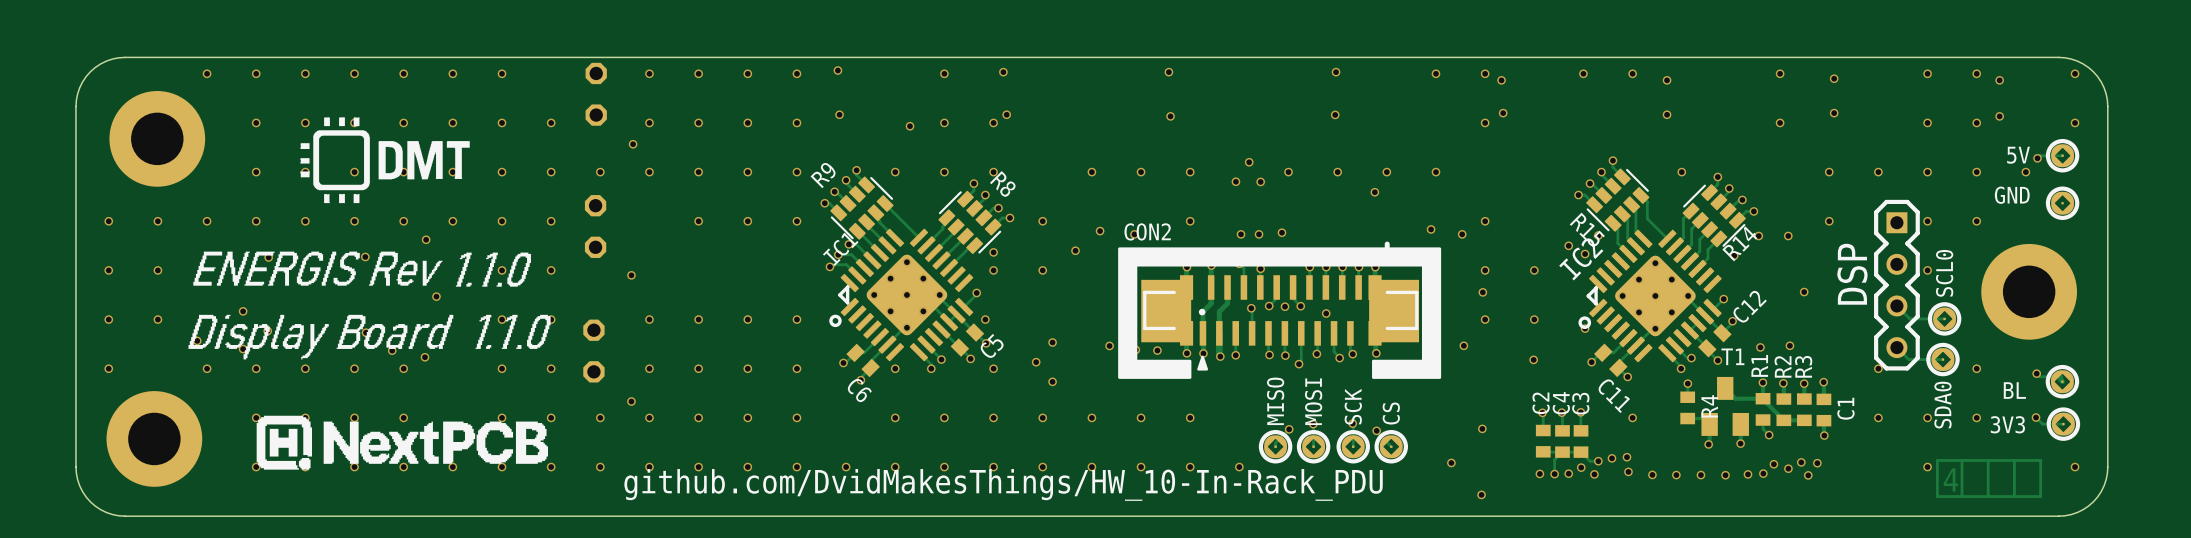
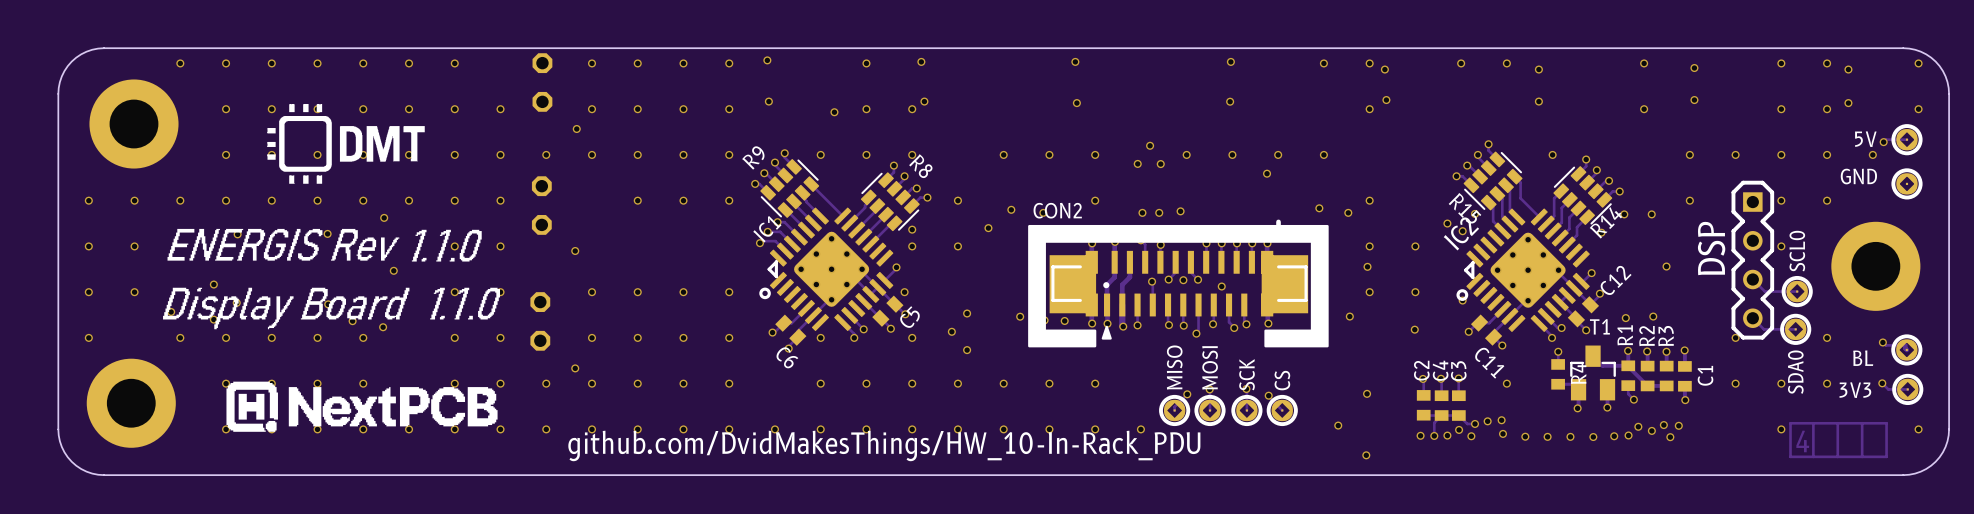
T1 footprint: [1701, 376, 1749, 436] -> [1570, 345, 1616, 401]

